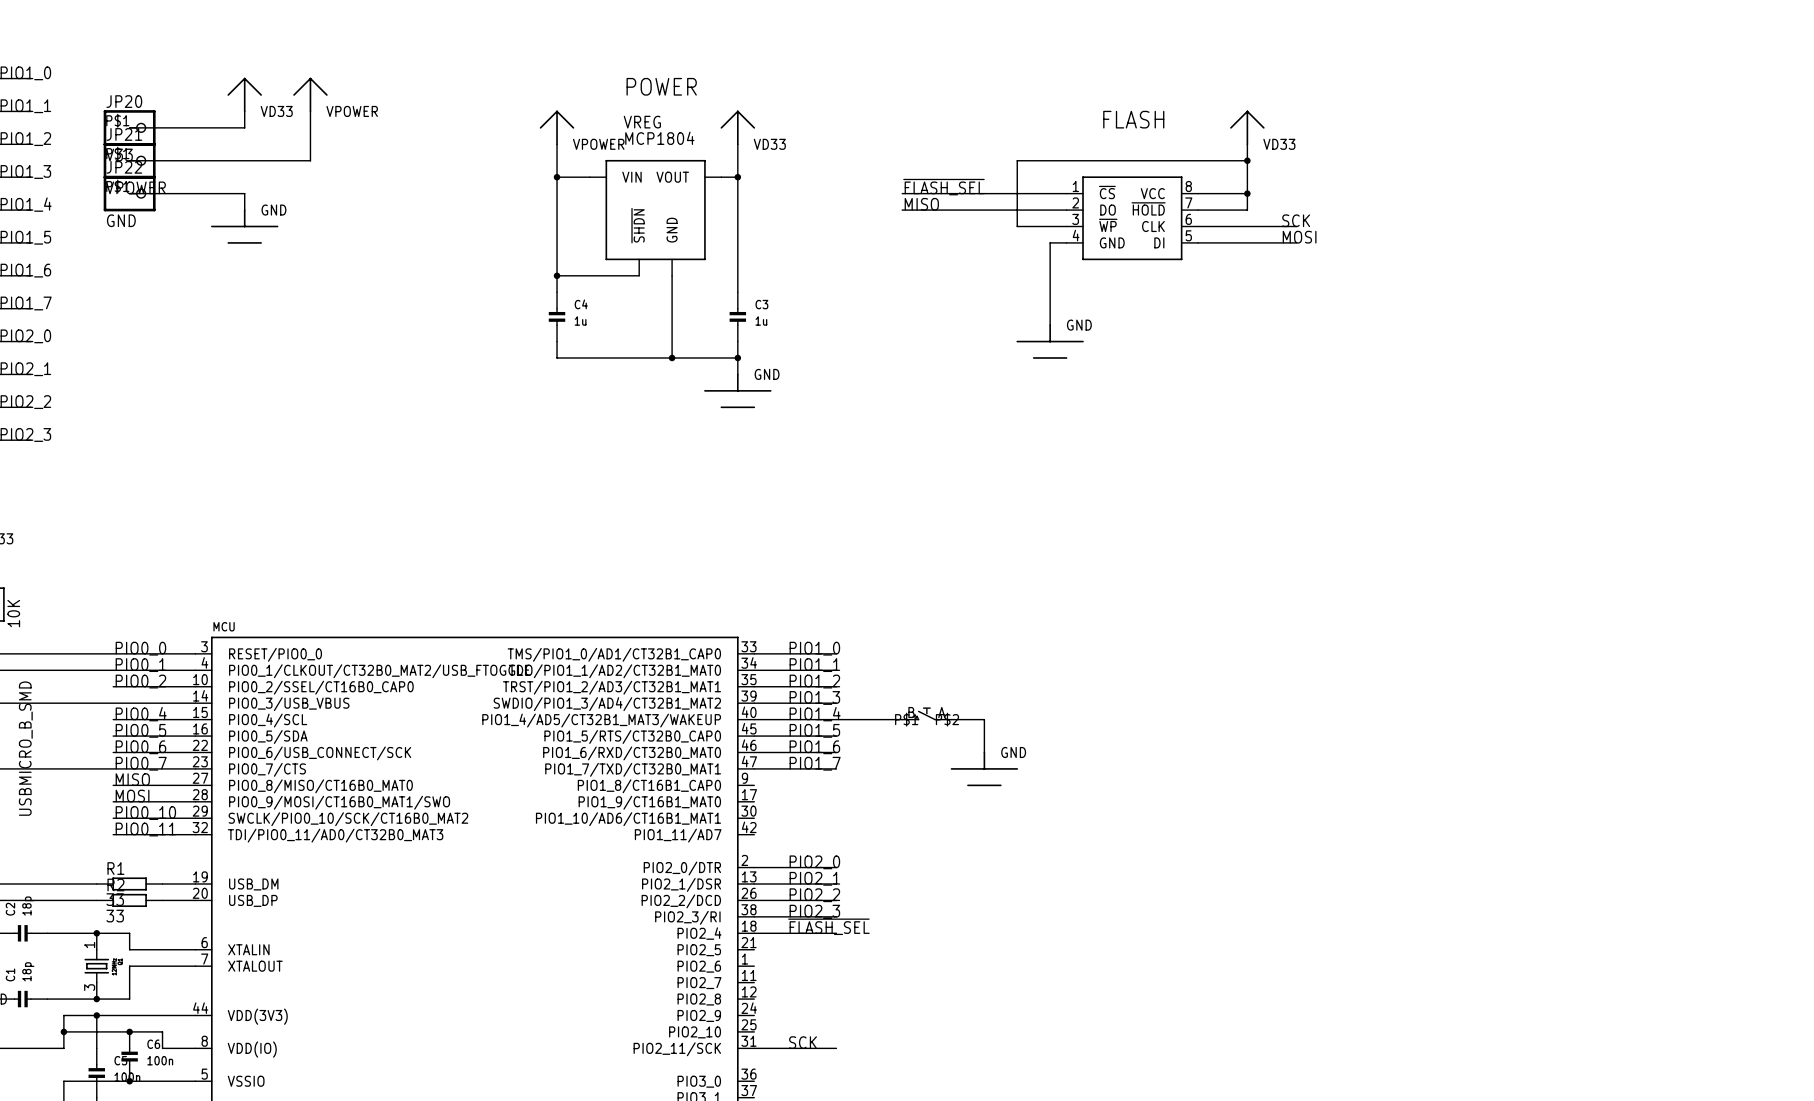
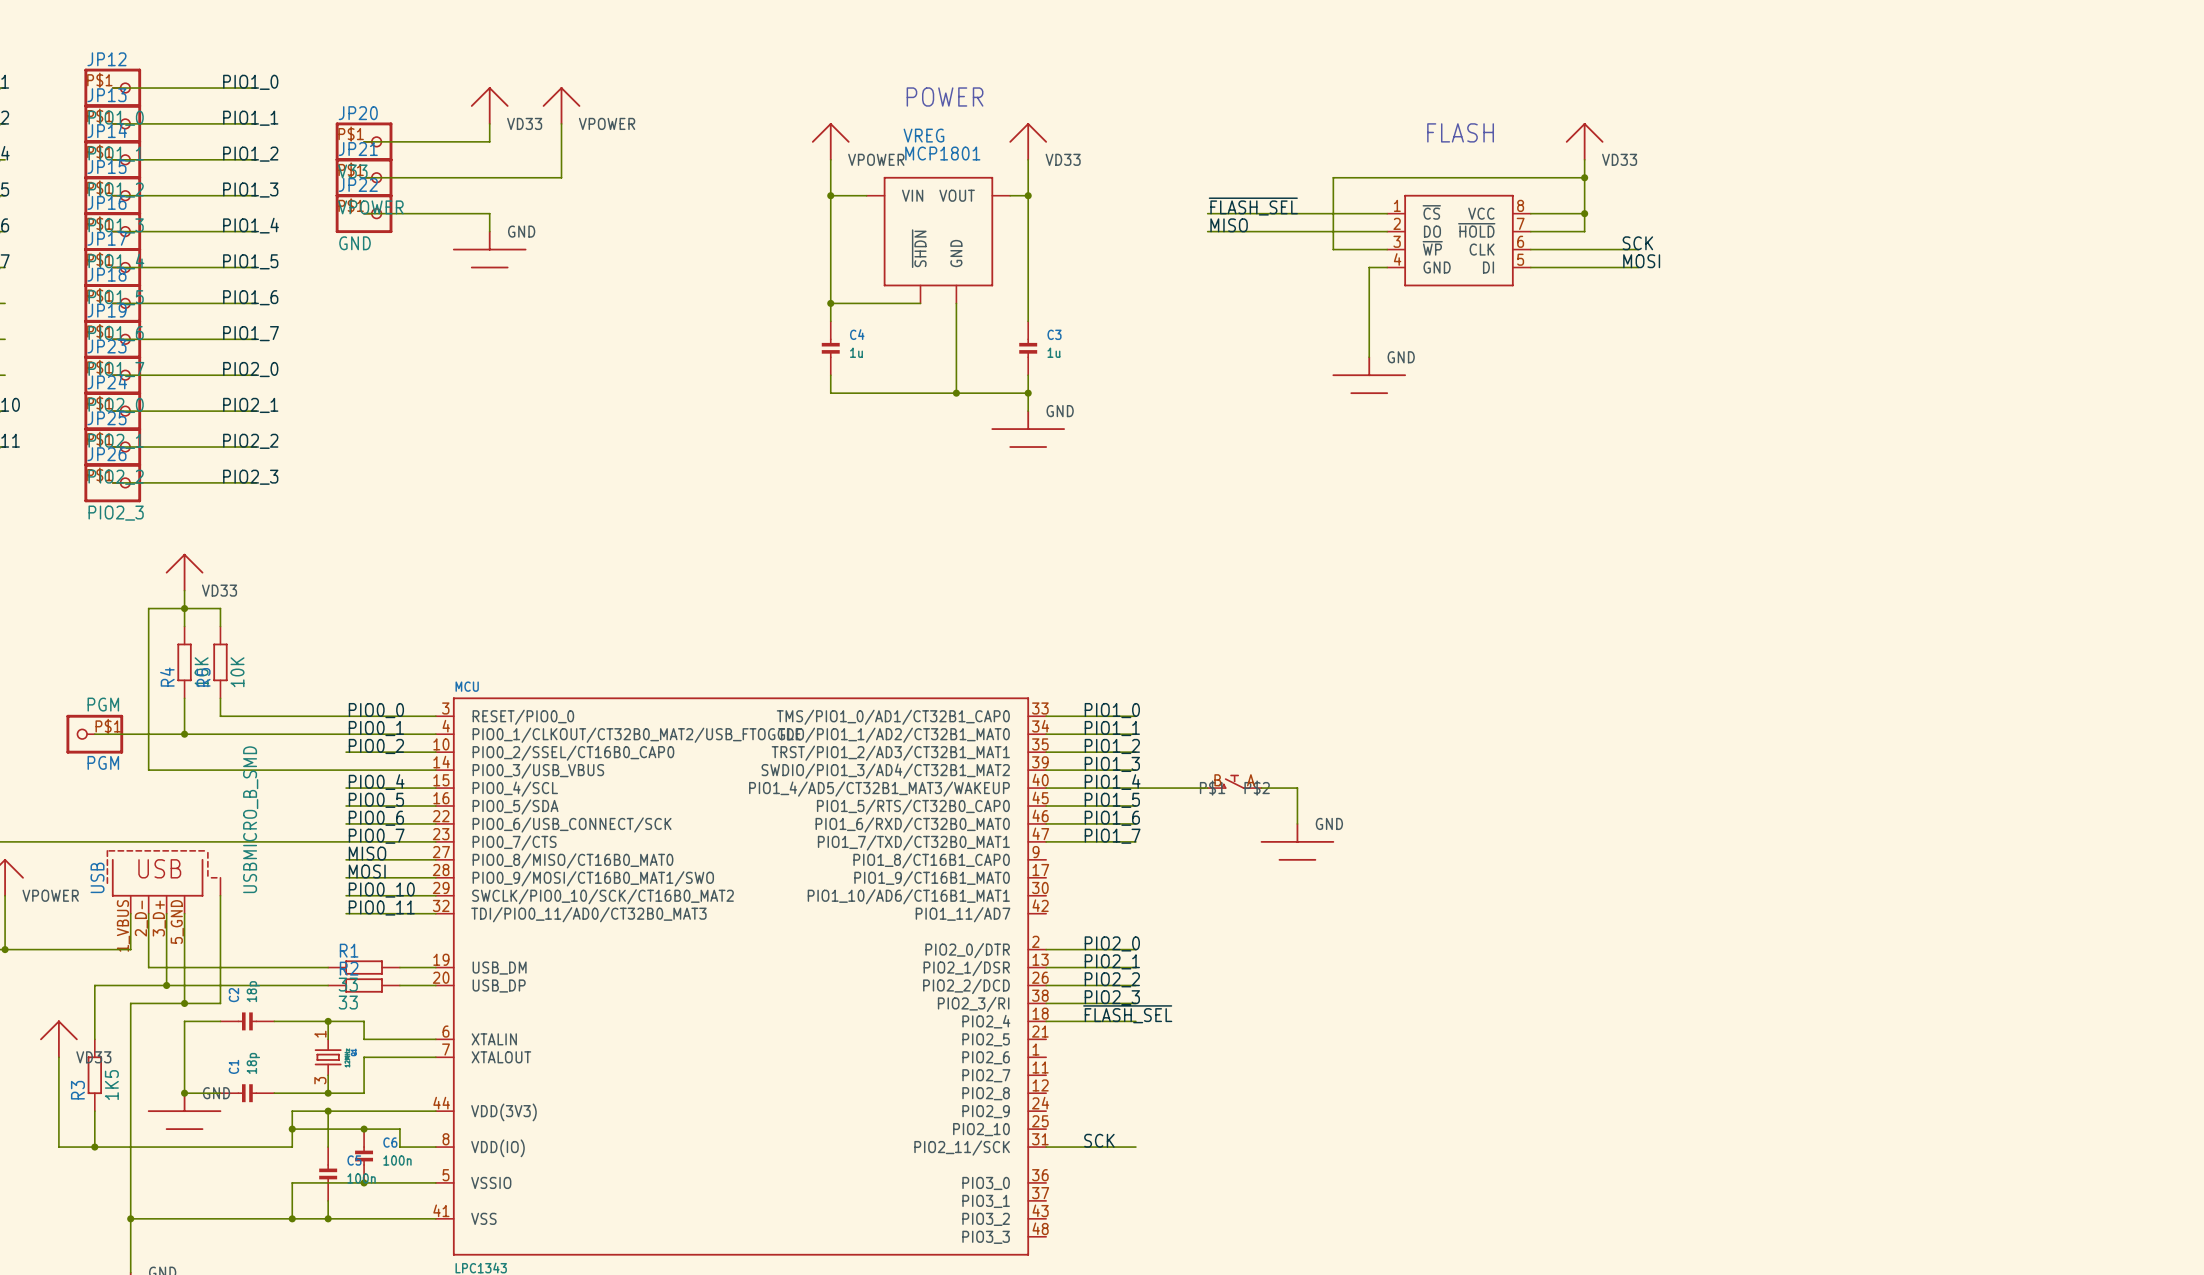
VREG value: MCP1804 (659, 138) -> MCP1801 (942, 153)

